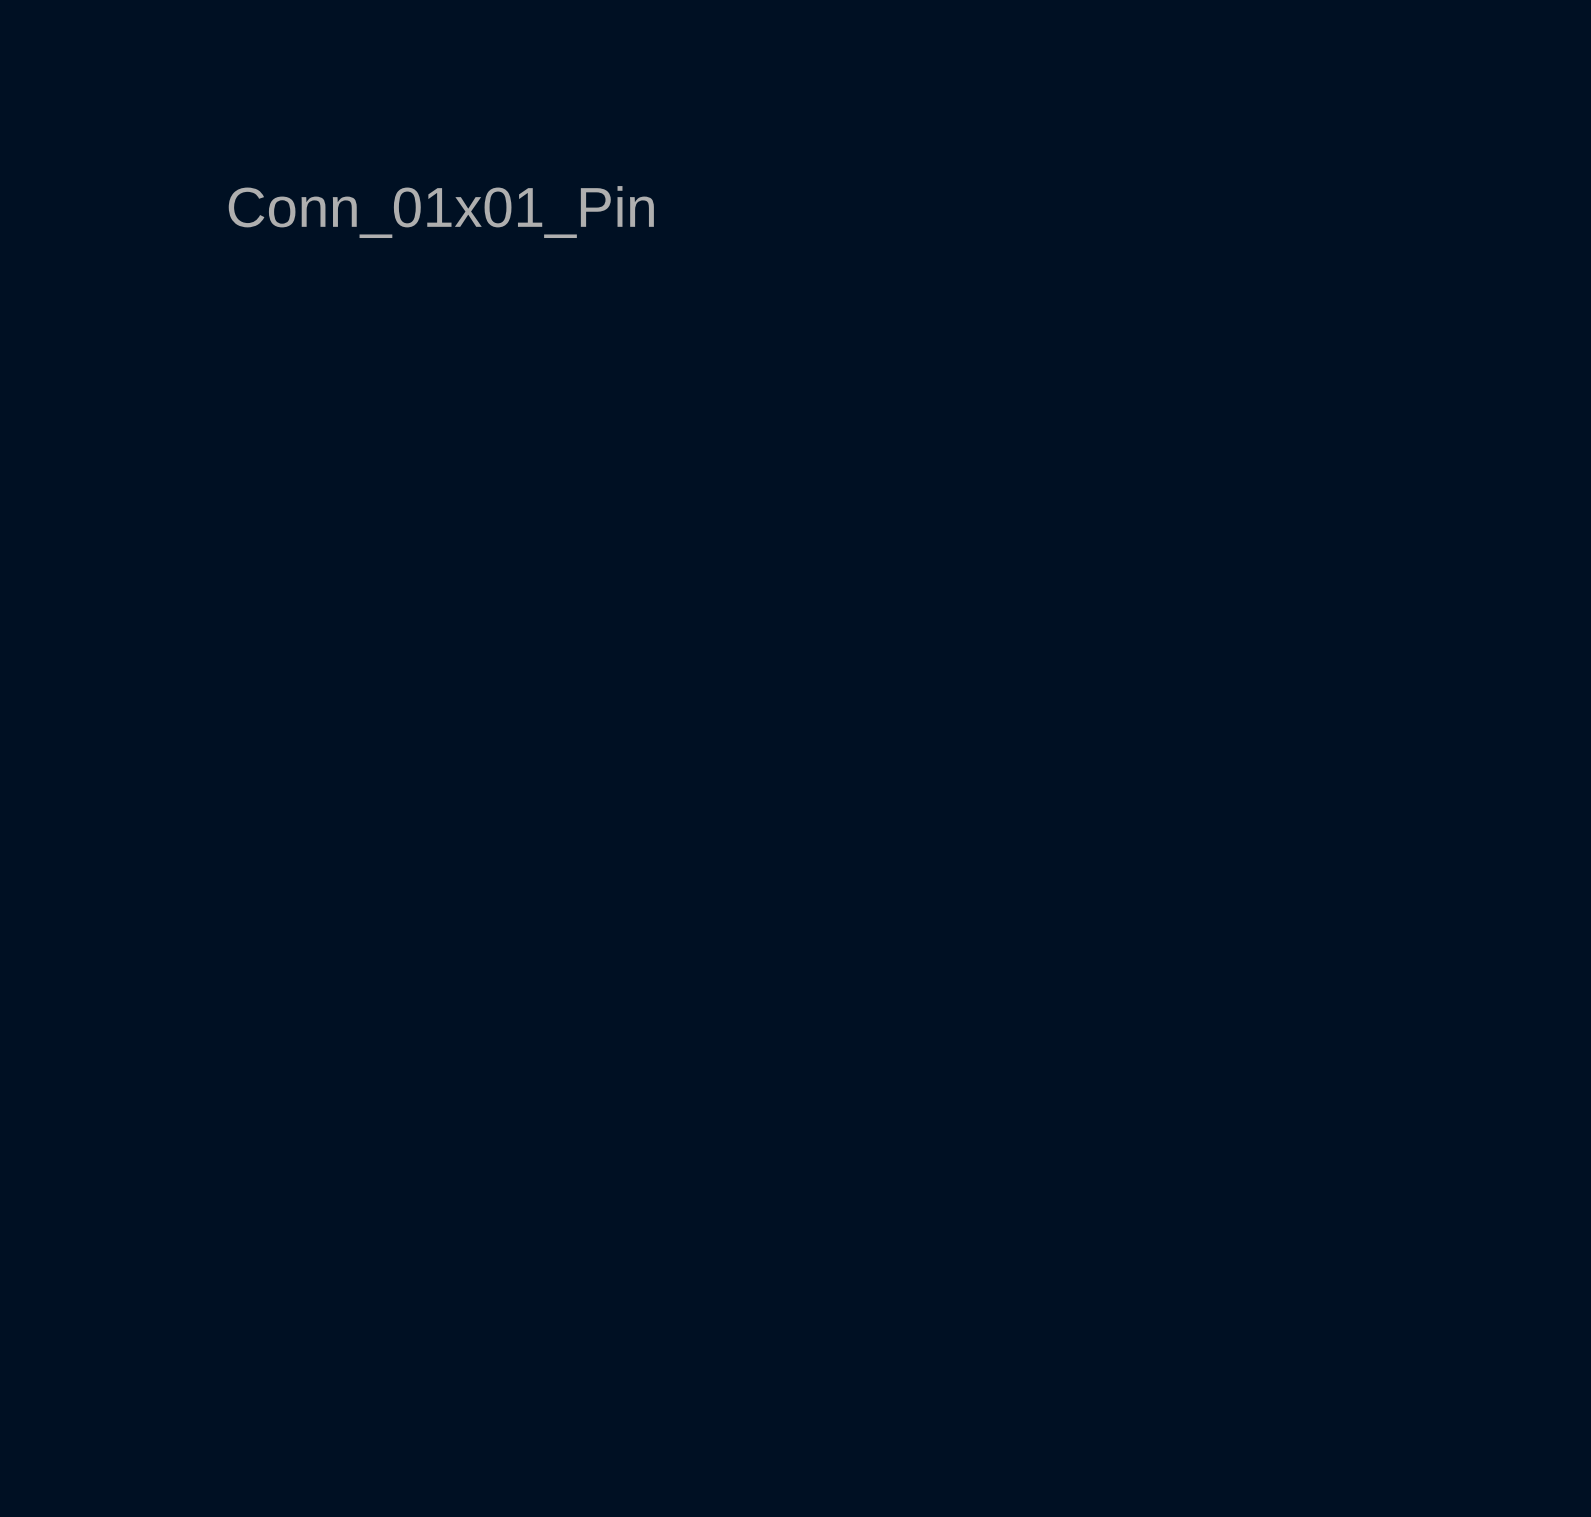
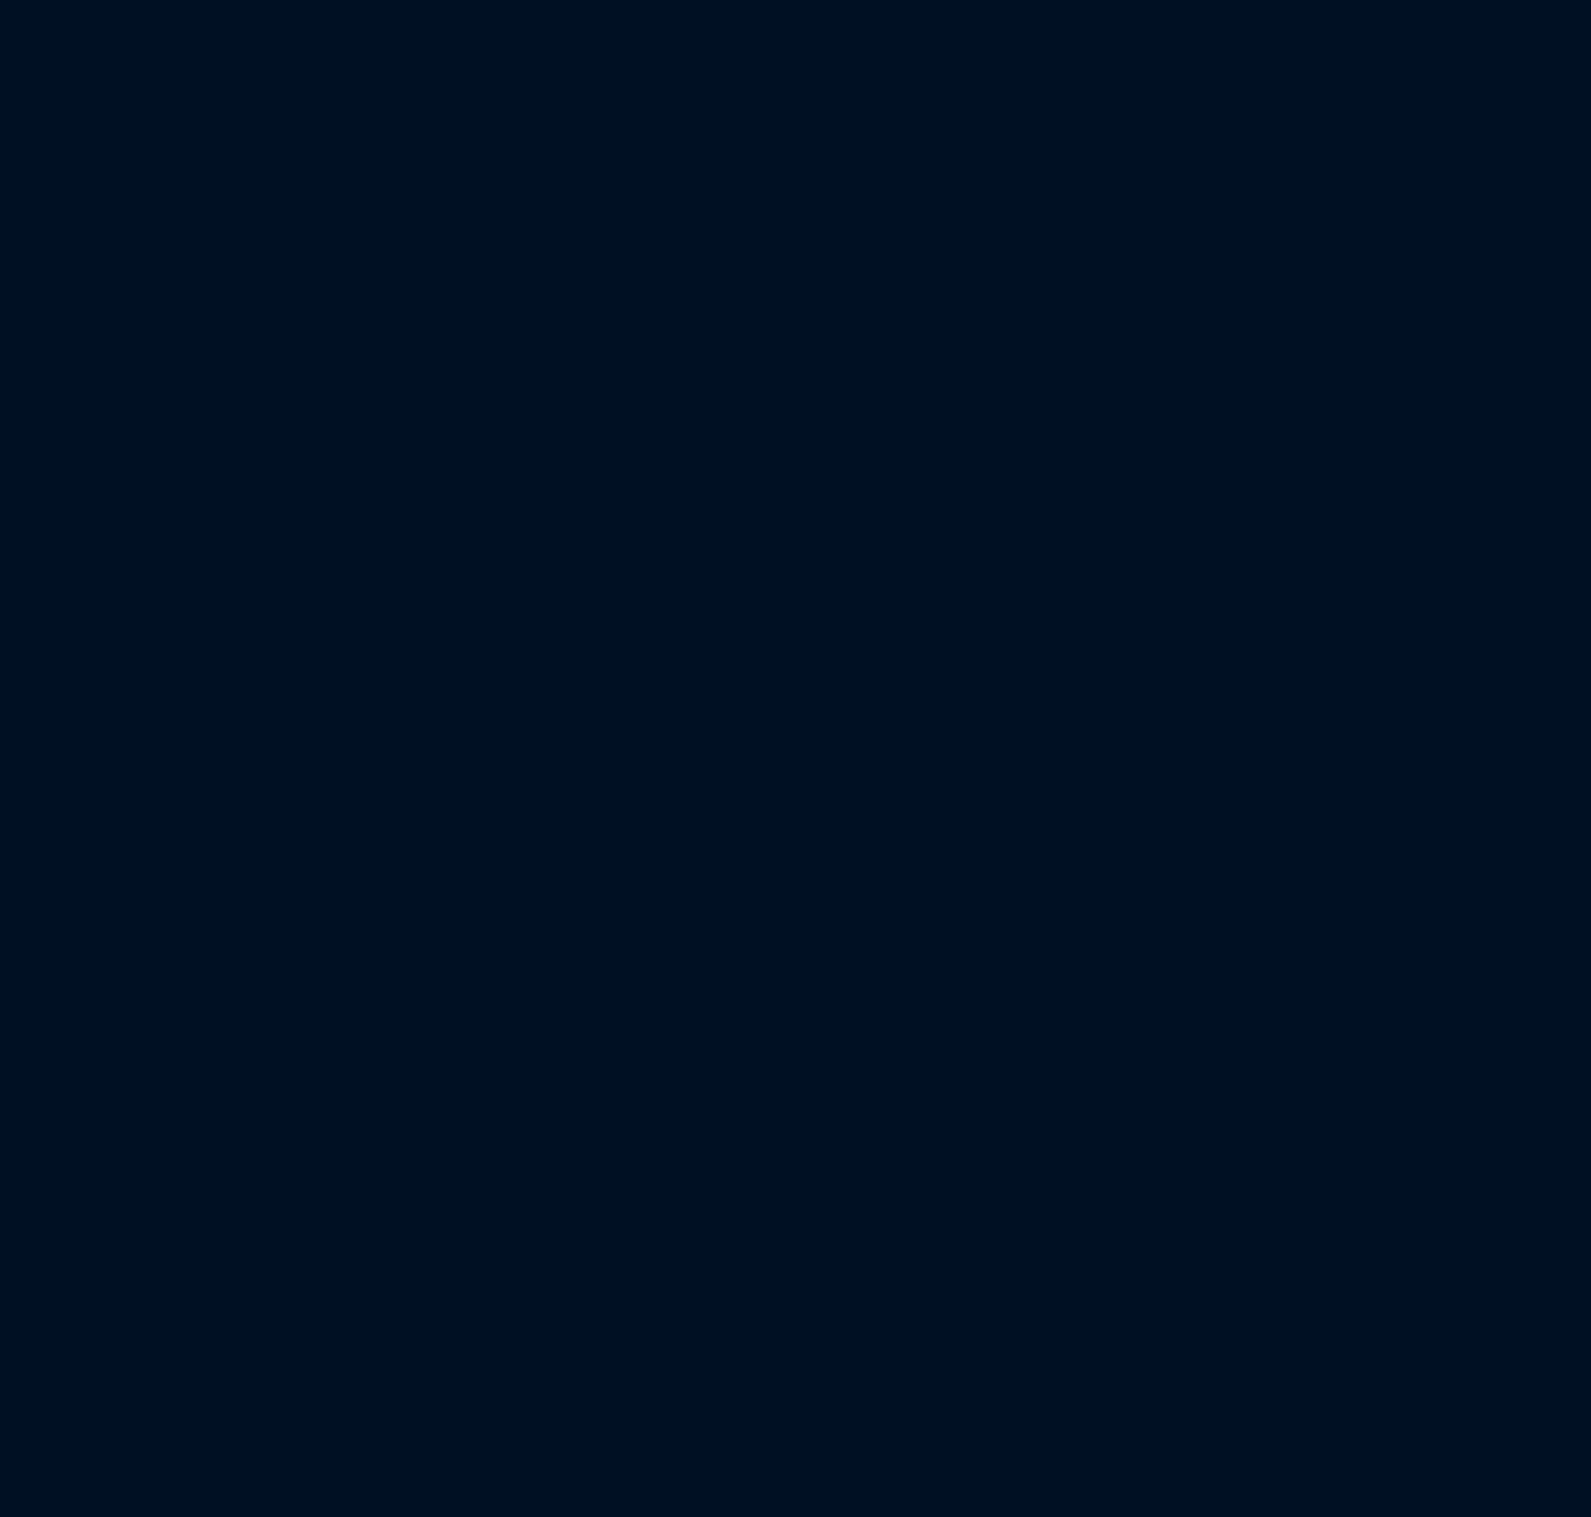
part value: Conn_01x01_Pin (441, 212) -> none

